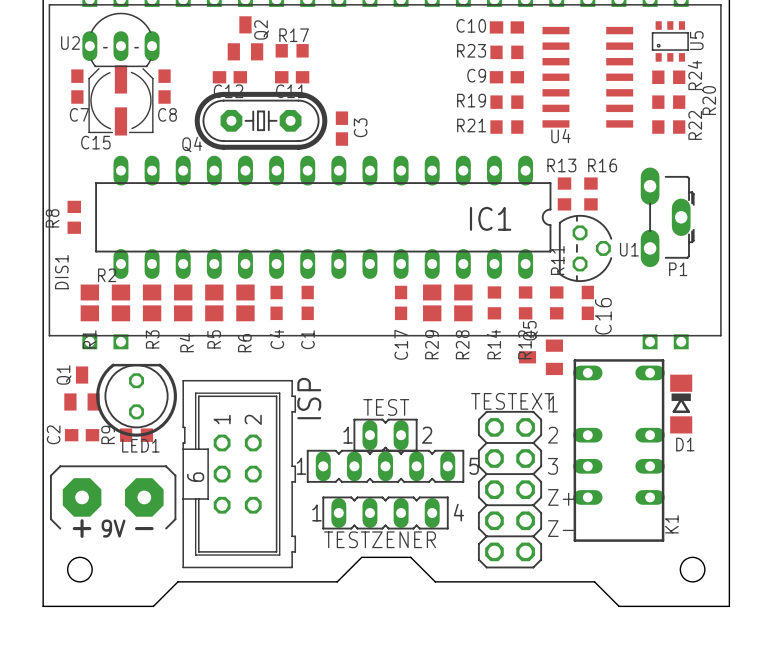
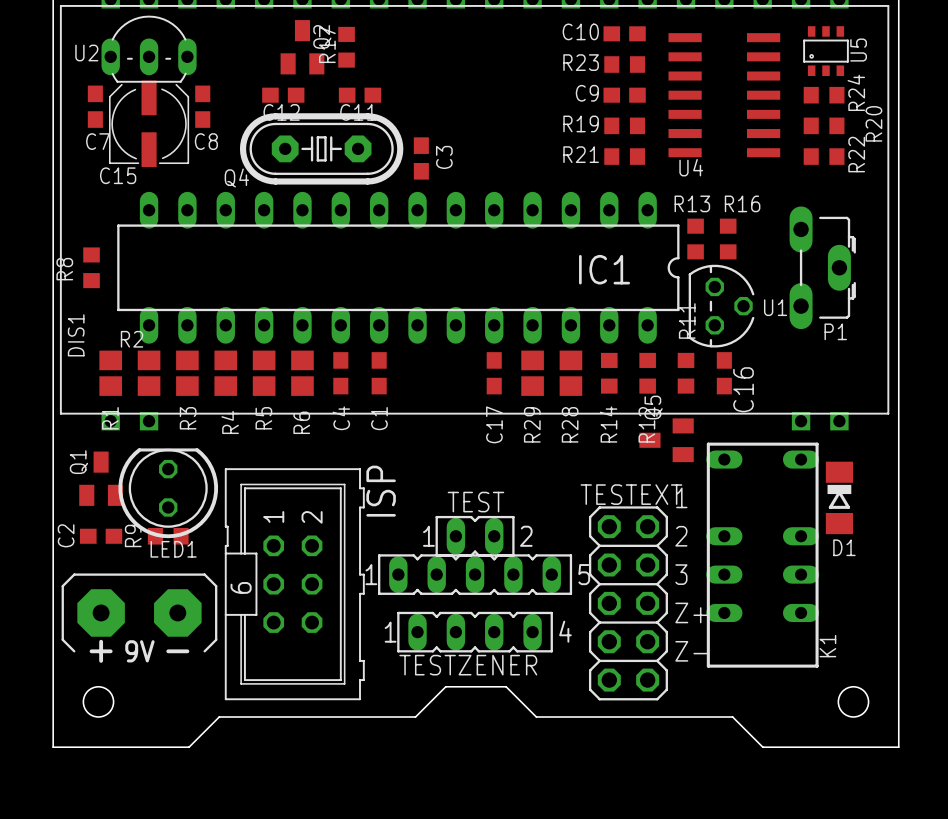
R17 rotation: 0° (292, 50) -> 90° clockwise (346, 47)

